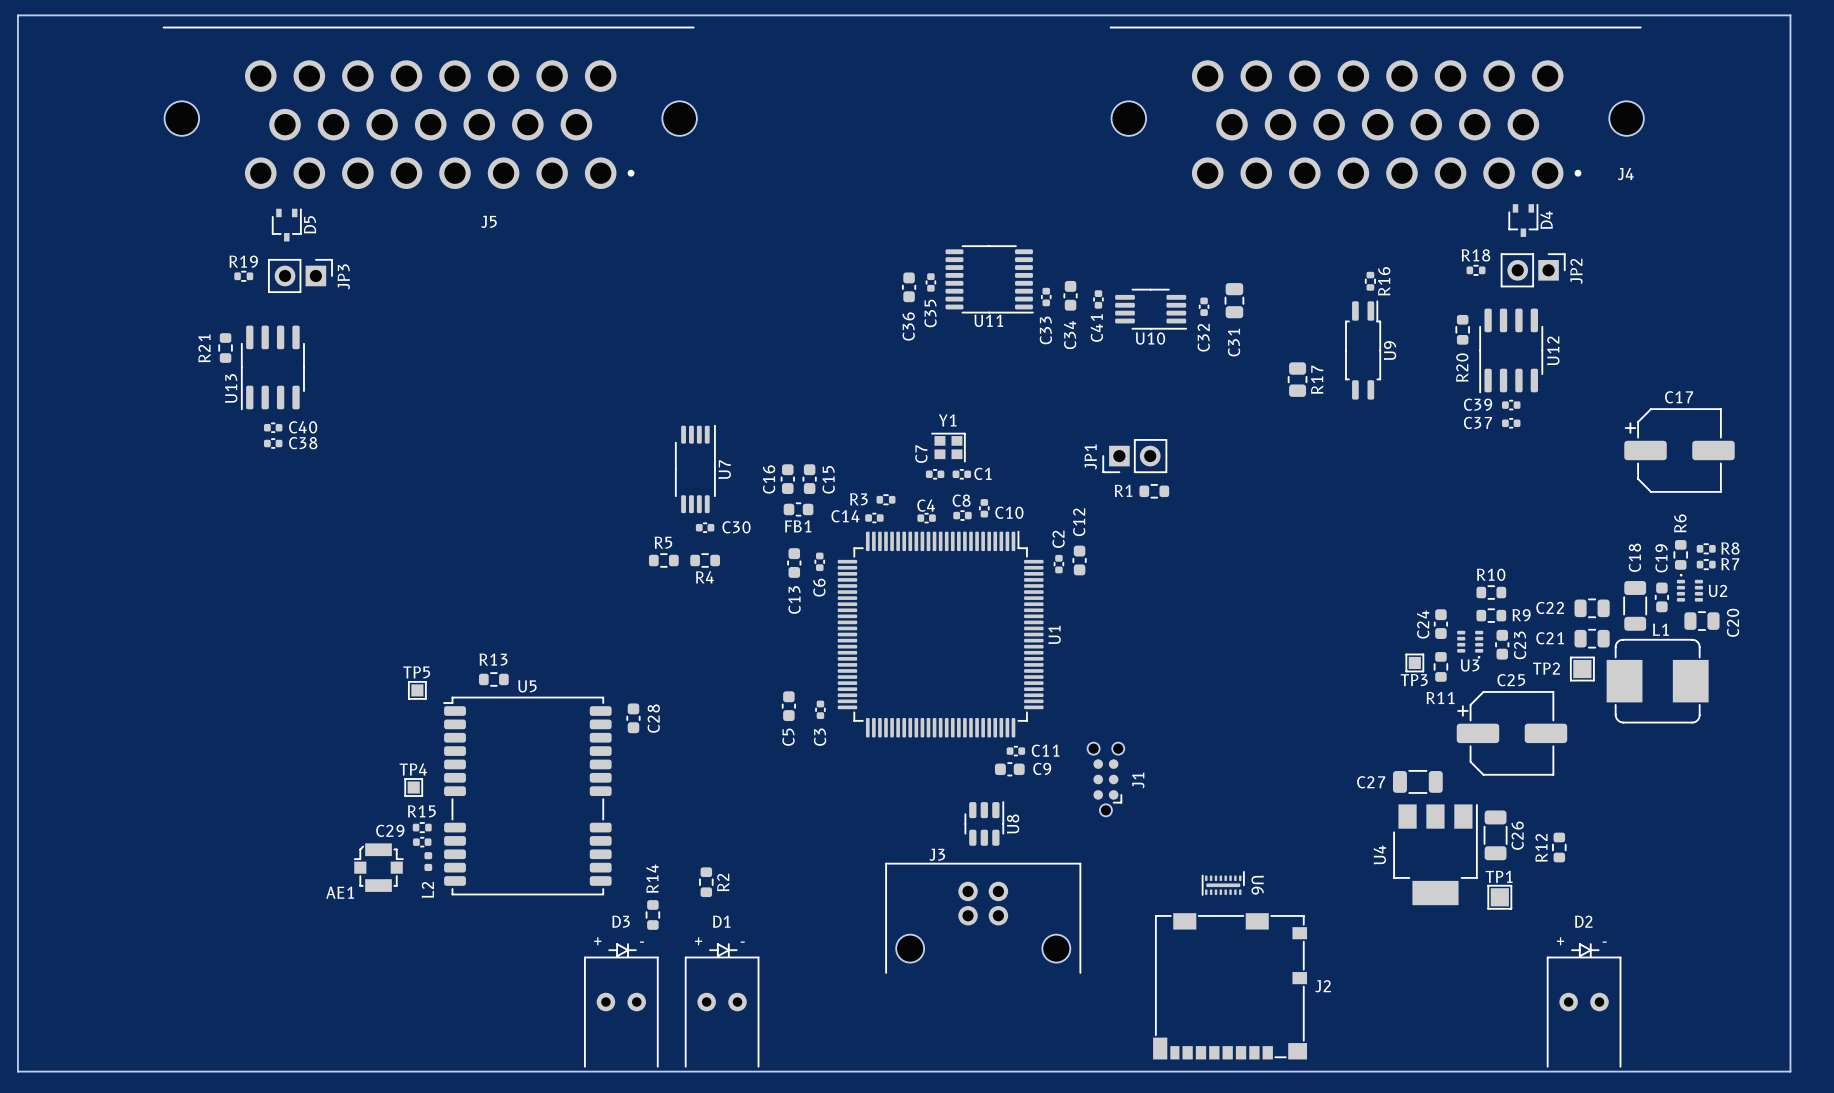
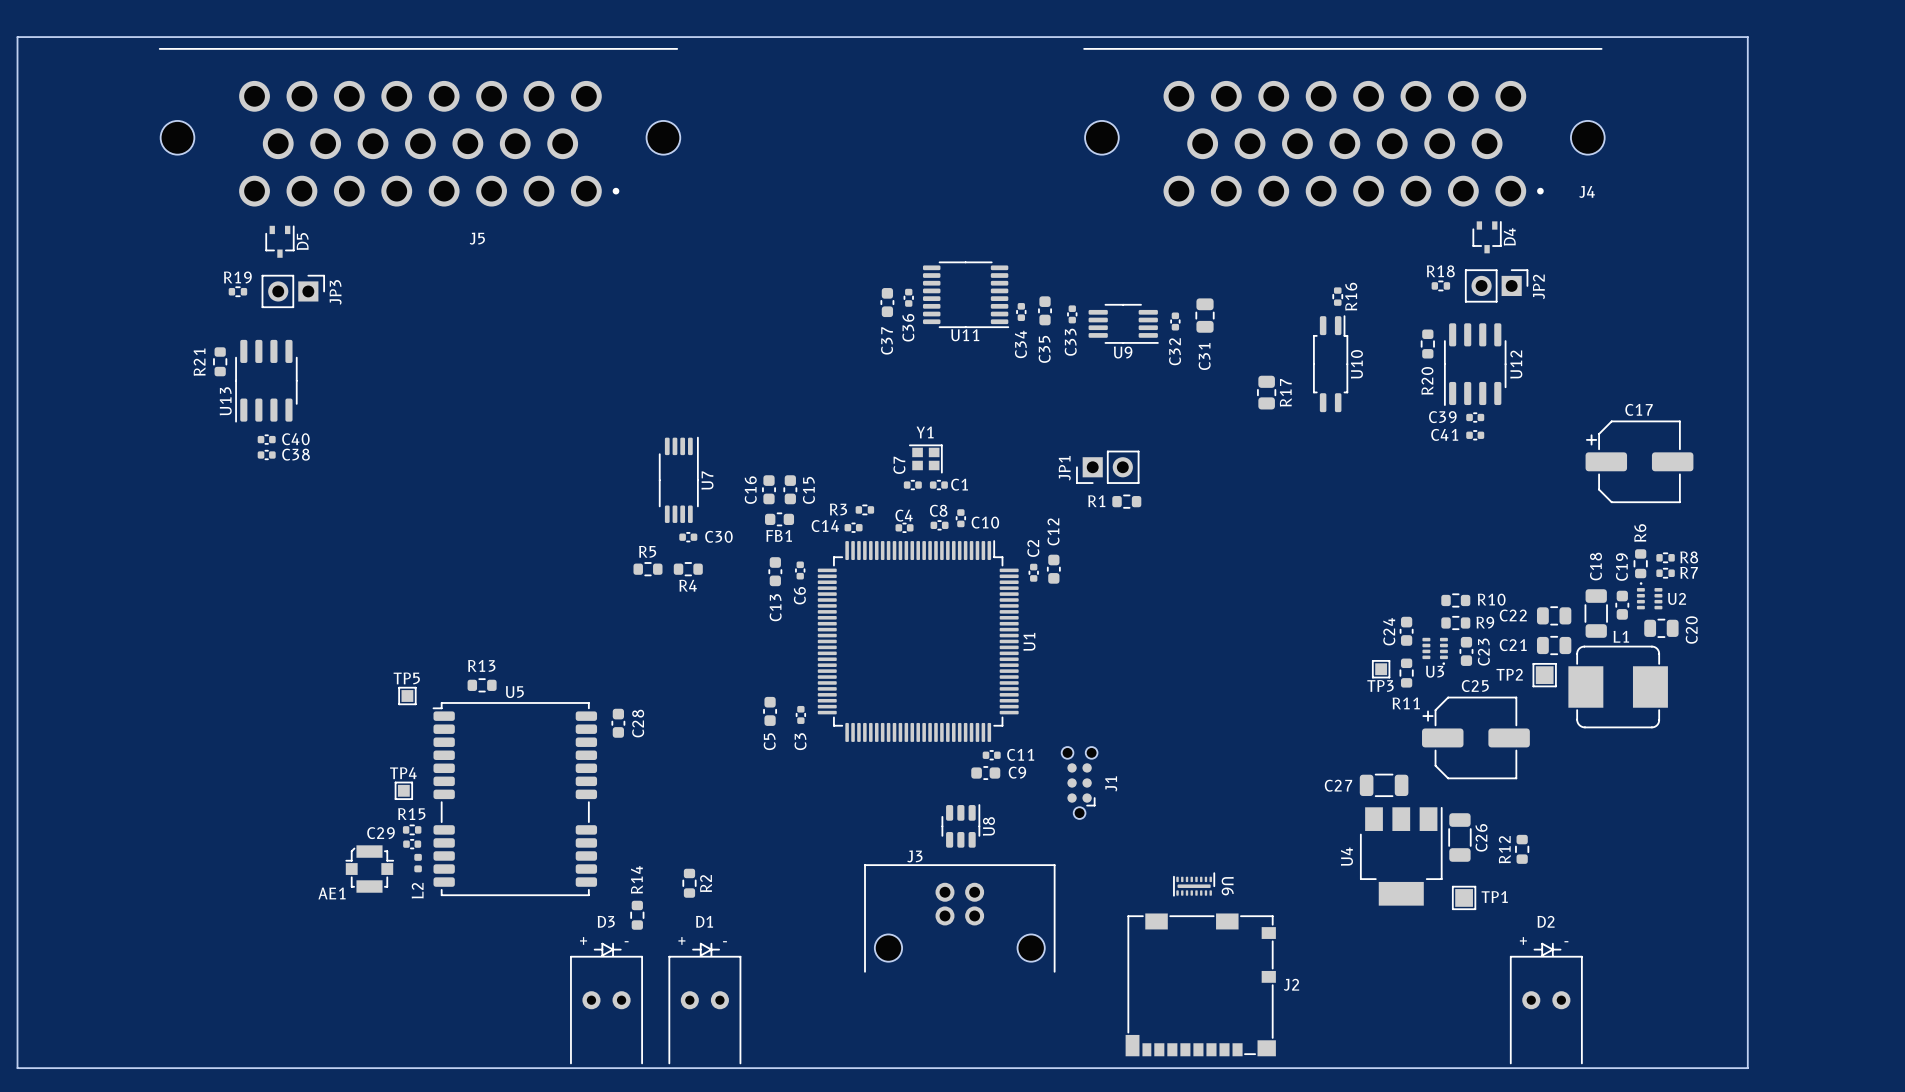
C35 name: C35 (930, 313) -> C36 (908, 327)
C36 name: C36 (908, 326) -> C37 (887, 340)
C41 name: C41 (1096, 328) -> C33 (1070, 342)
C33 name: C33 (1045, 330) -> C34 (1020, 344)
C34 name: C34 (1070, 335) -> C35 (1044, 349)
U10 name: U10 (1150, 338) -> U9 (1123, 352)
U9 name: U9 (1390, 350) -> U10 (1356, 364)
C37 name: C37 (1477, 422) -> C41 (1444, 434)
R10 name position: R10 (1491, 574) -> R10 (1491, 599)
TP1 name position: TP1 (1499, 876) -> TP1 (1494, 897)

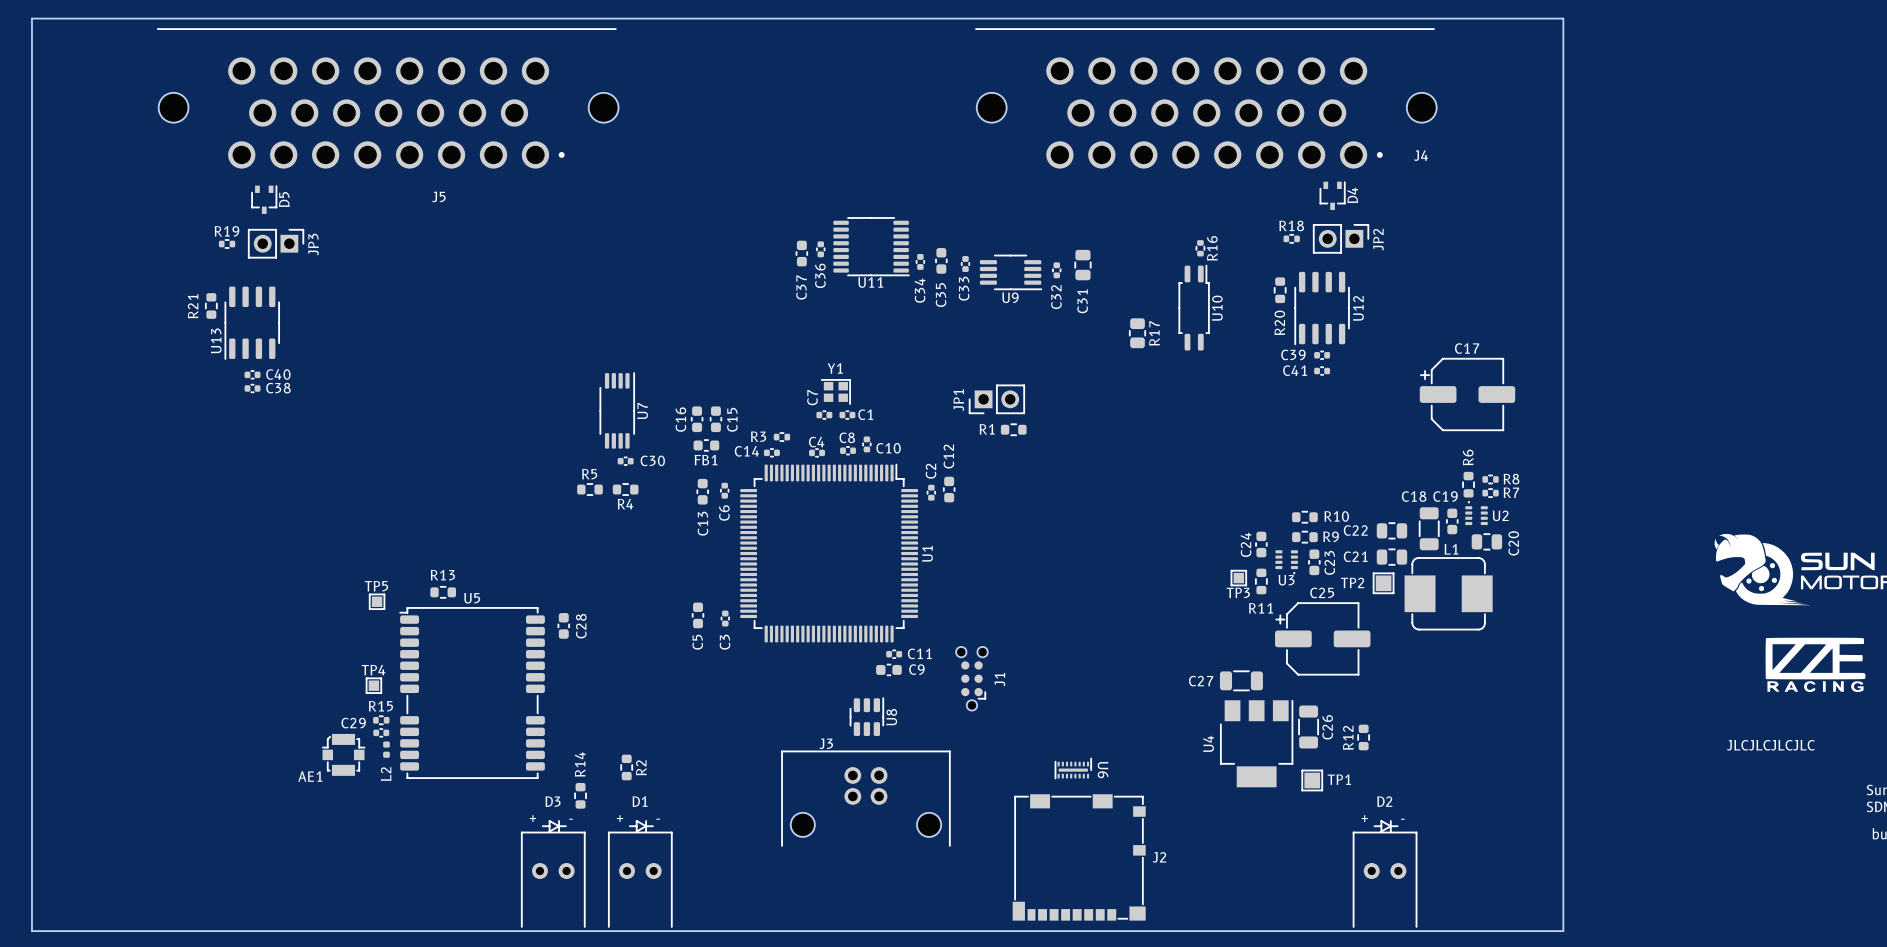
C18 name rotation: 0° (1595, 566) -> 90° clockwise (1414, 496)
C19 name rotation: 0° (1621, 567) -> 90° clockwise (1445, 496)

